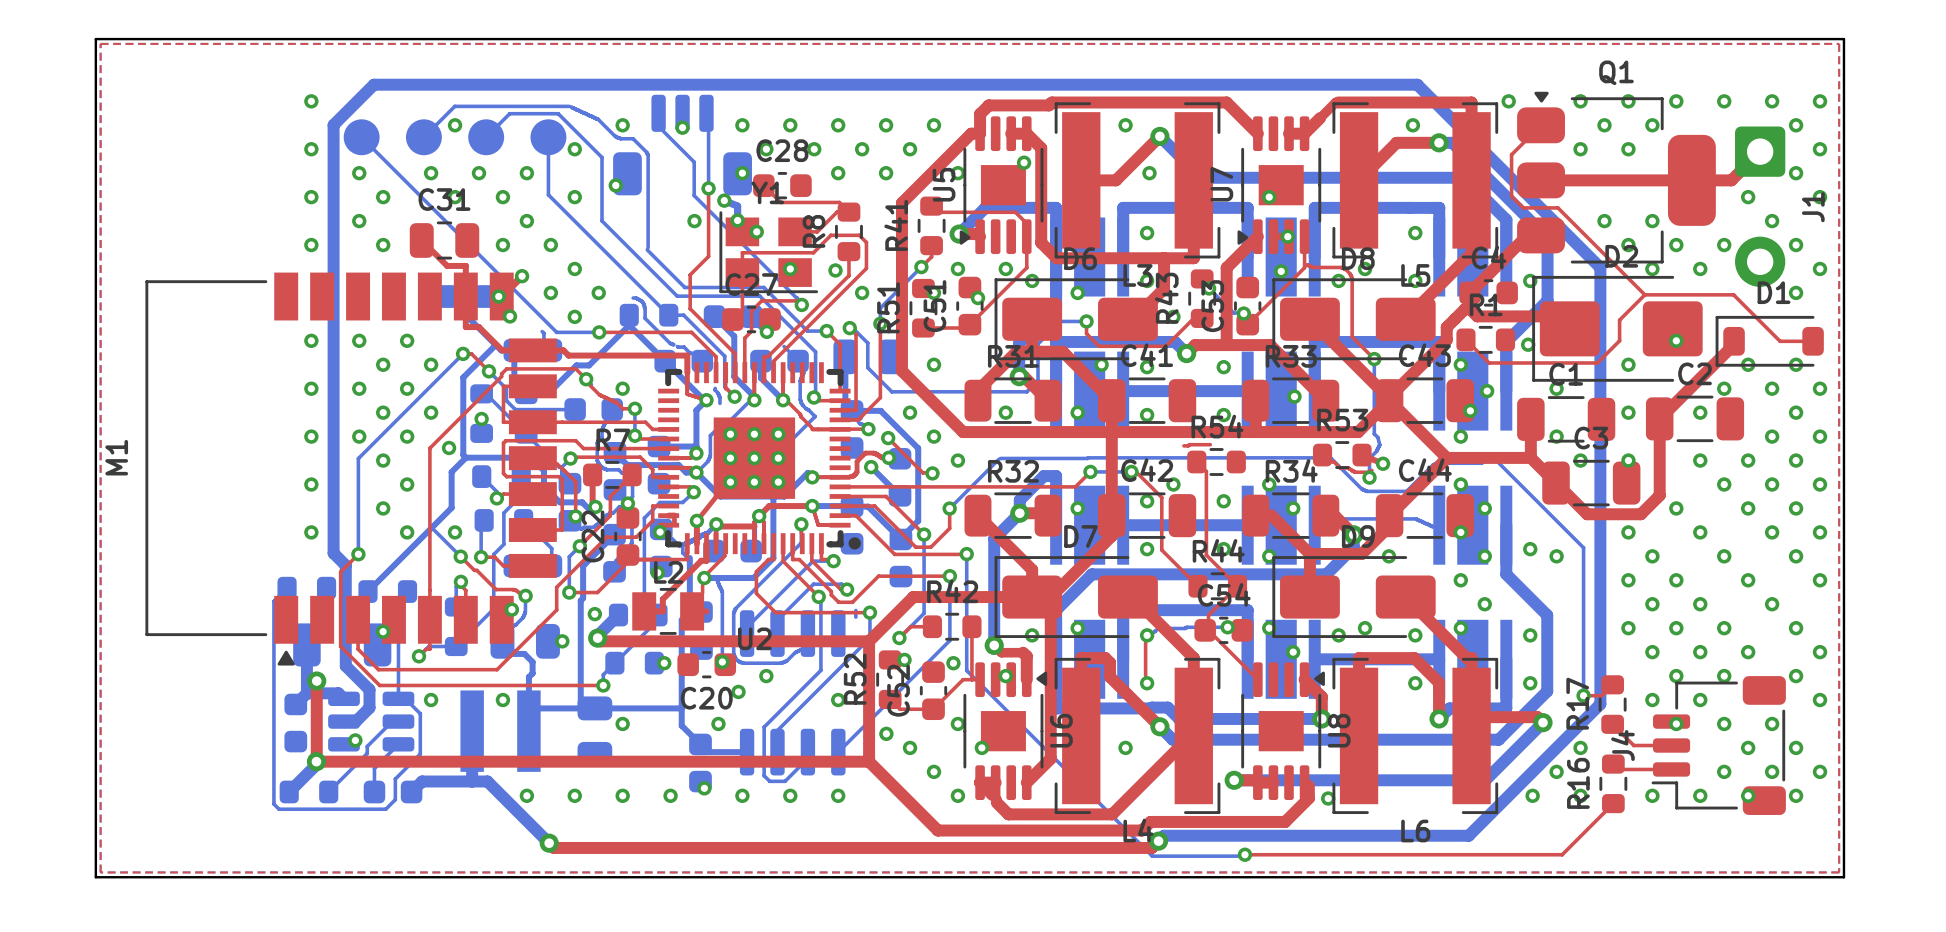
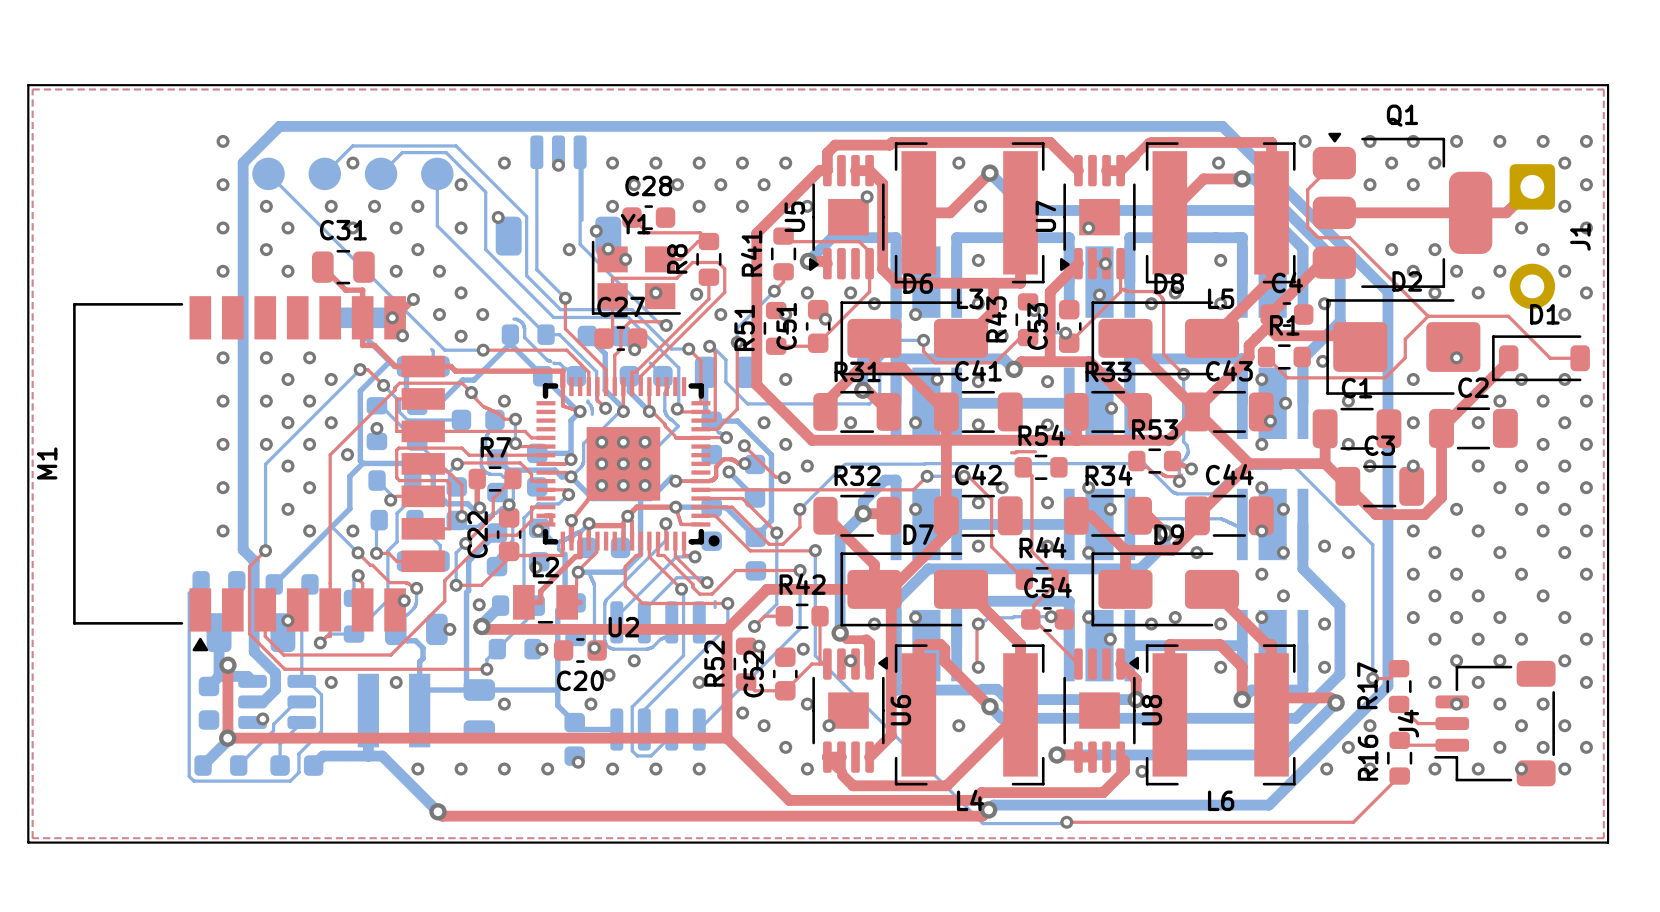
part footprint: [613, 94, 752, 196] -> [495, 135, 622, 256]
bottom track: none -> (456, 145) (526, 216) (526, 275)
bottom track: (571, 107) (597, 119) (616, 137) (633, 138) (646, 152) (648, 247) -> none
bottom track: none -> (536, 152) (536, 269) (565, 298)
bottom track: none -> (580, 152) (580, 244) (661, 325) (666, 325)
bottom track: (663, 131) (694, 162) (694, 195) (797, 298) -> none
top track: (708, 188) (708, 256) (690, 274) -> none
via position: (708, 188) -> (565, 298)

